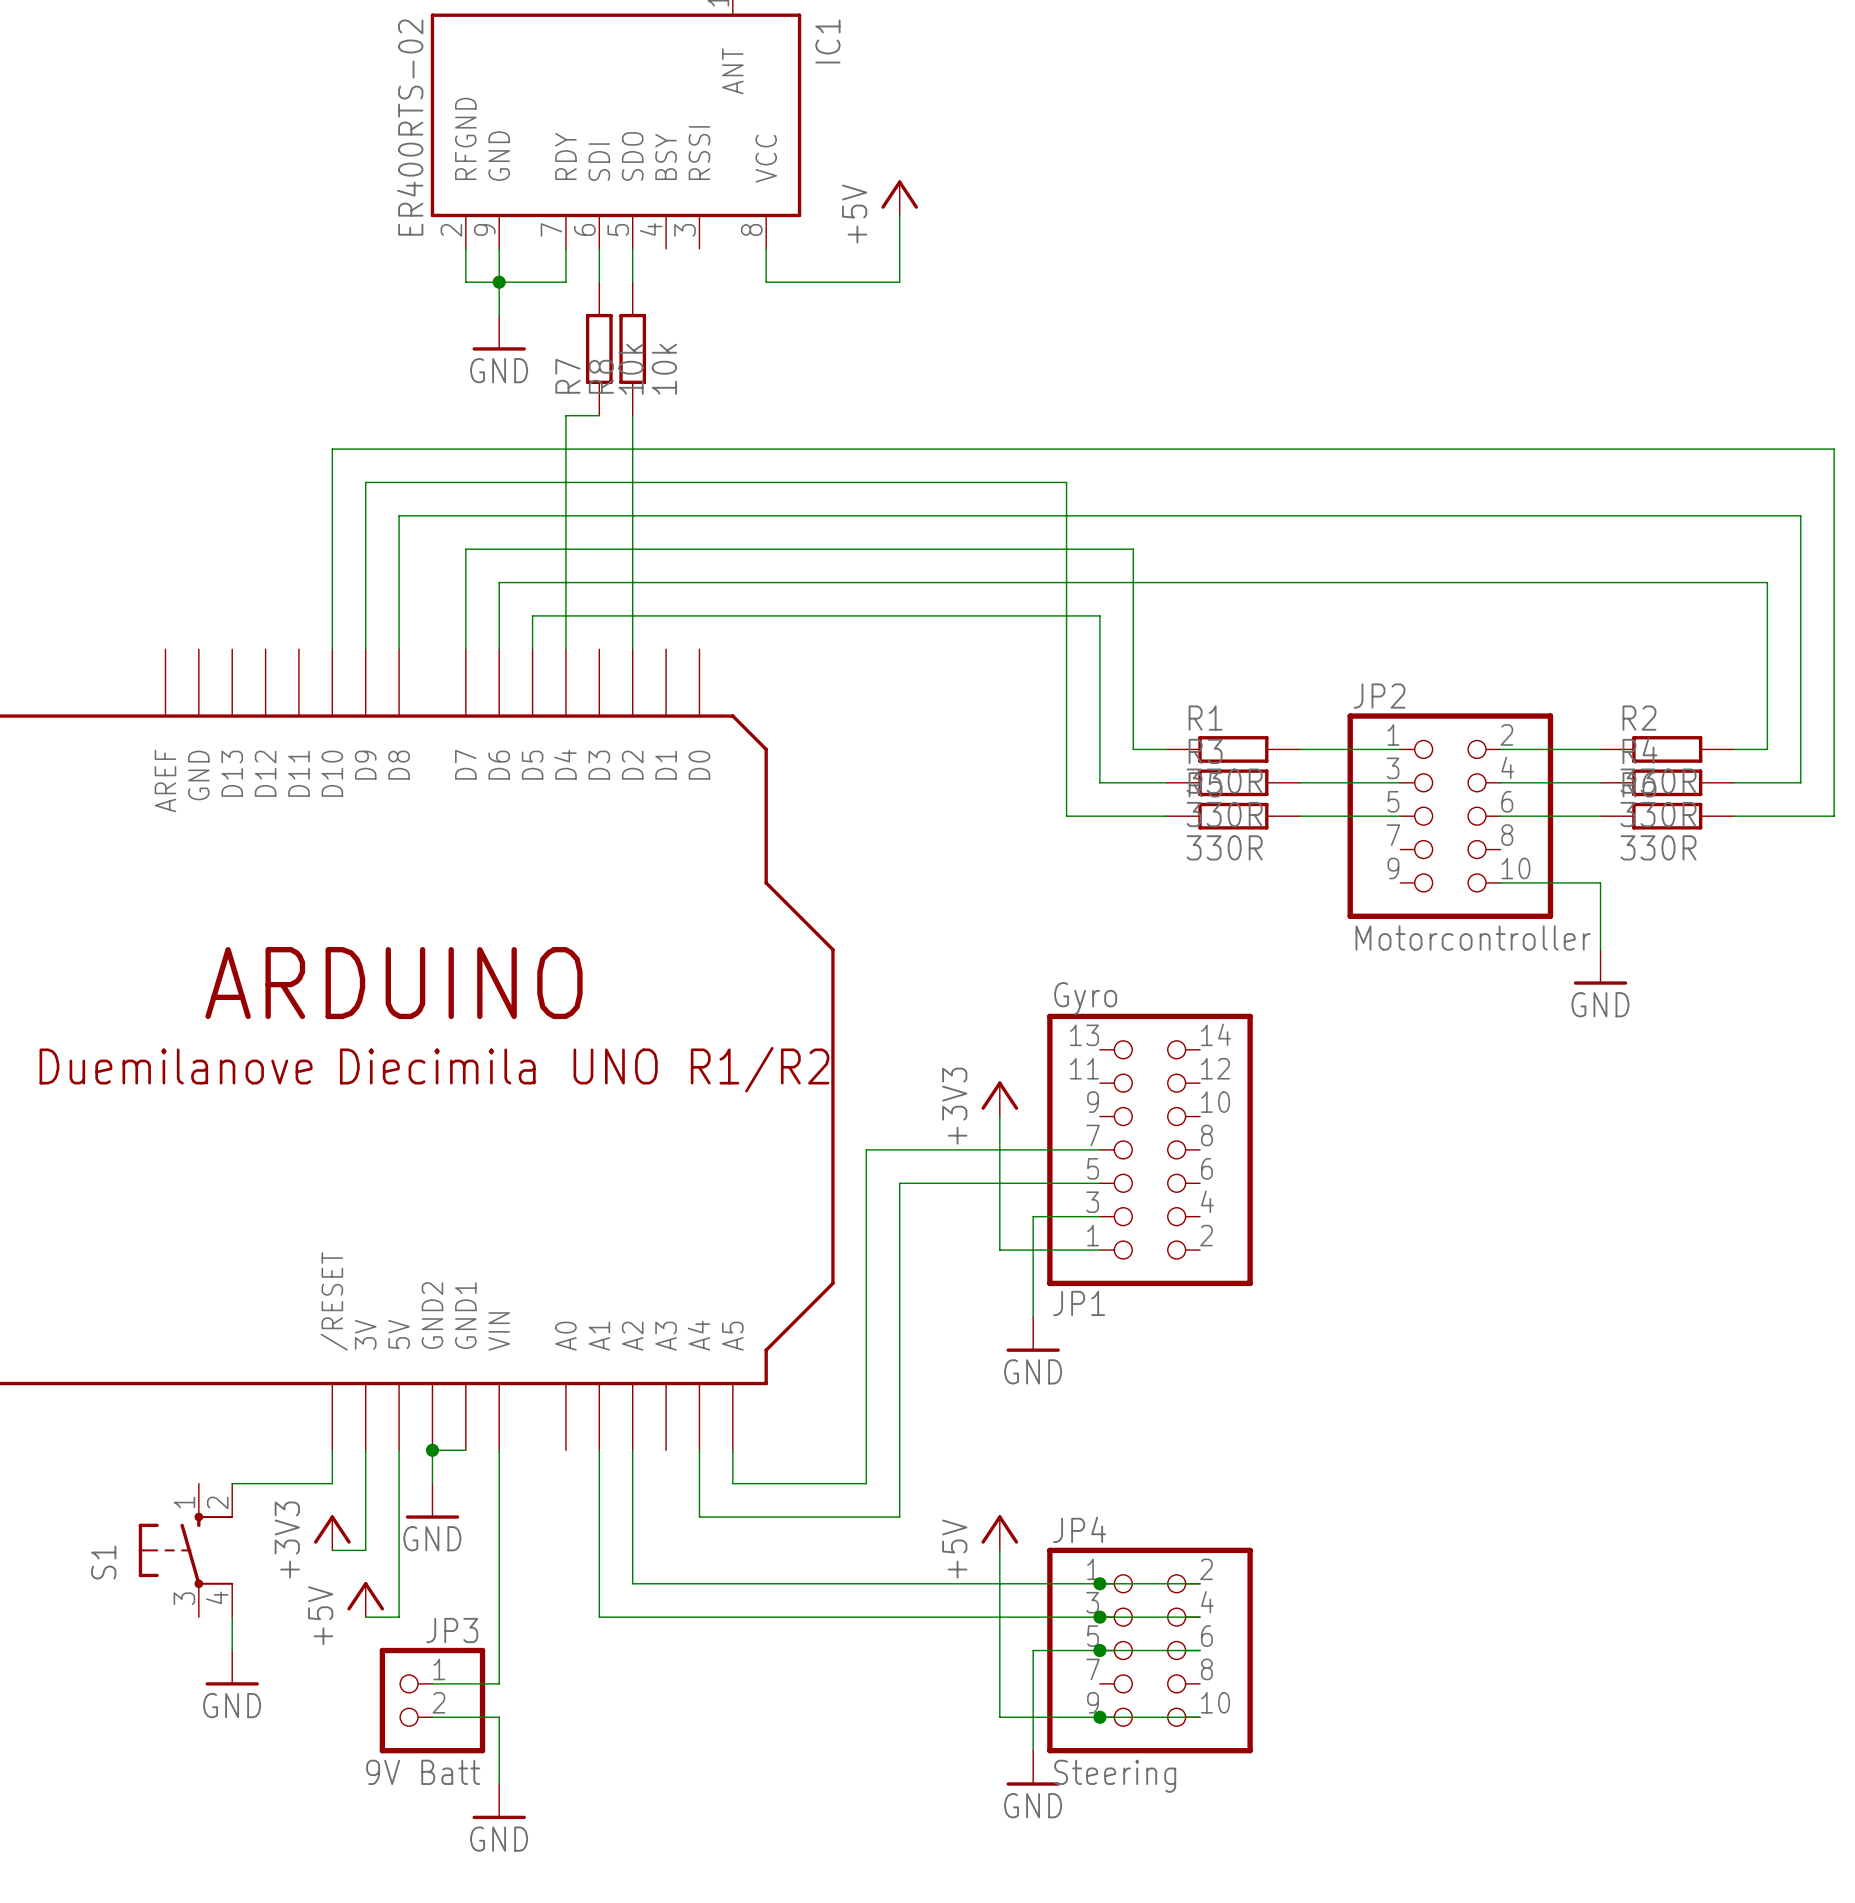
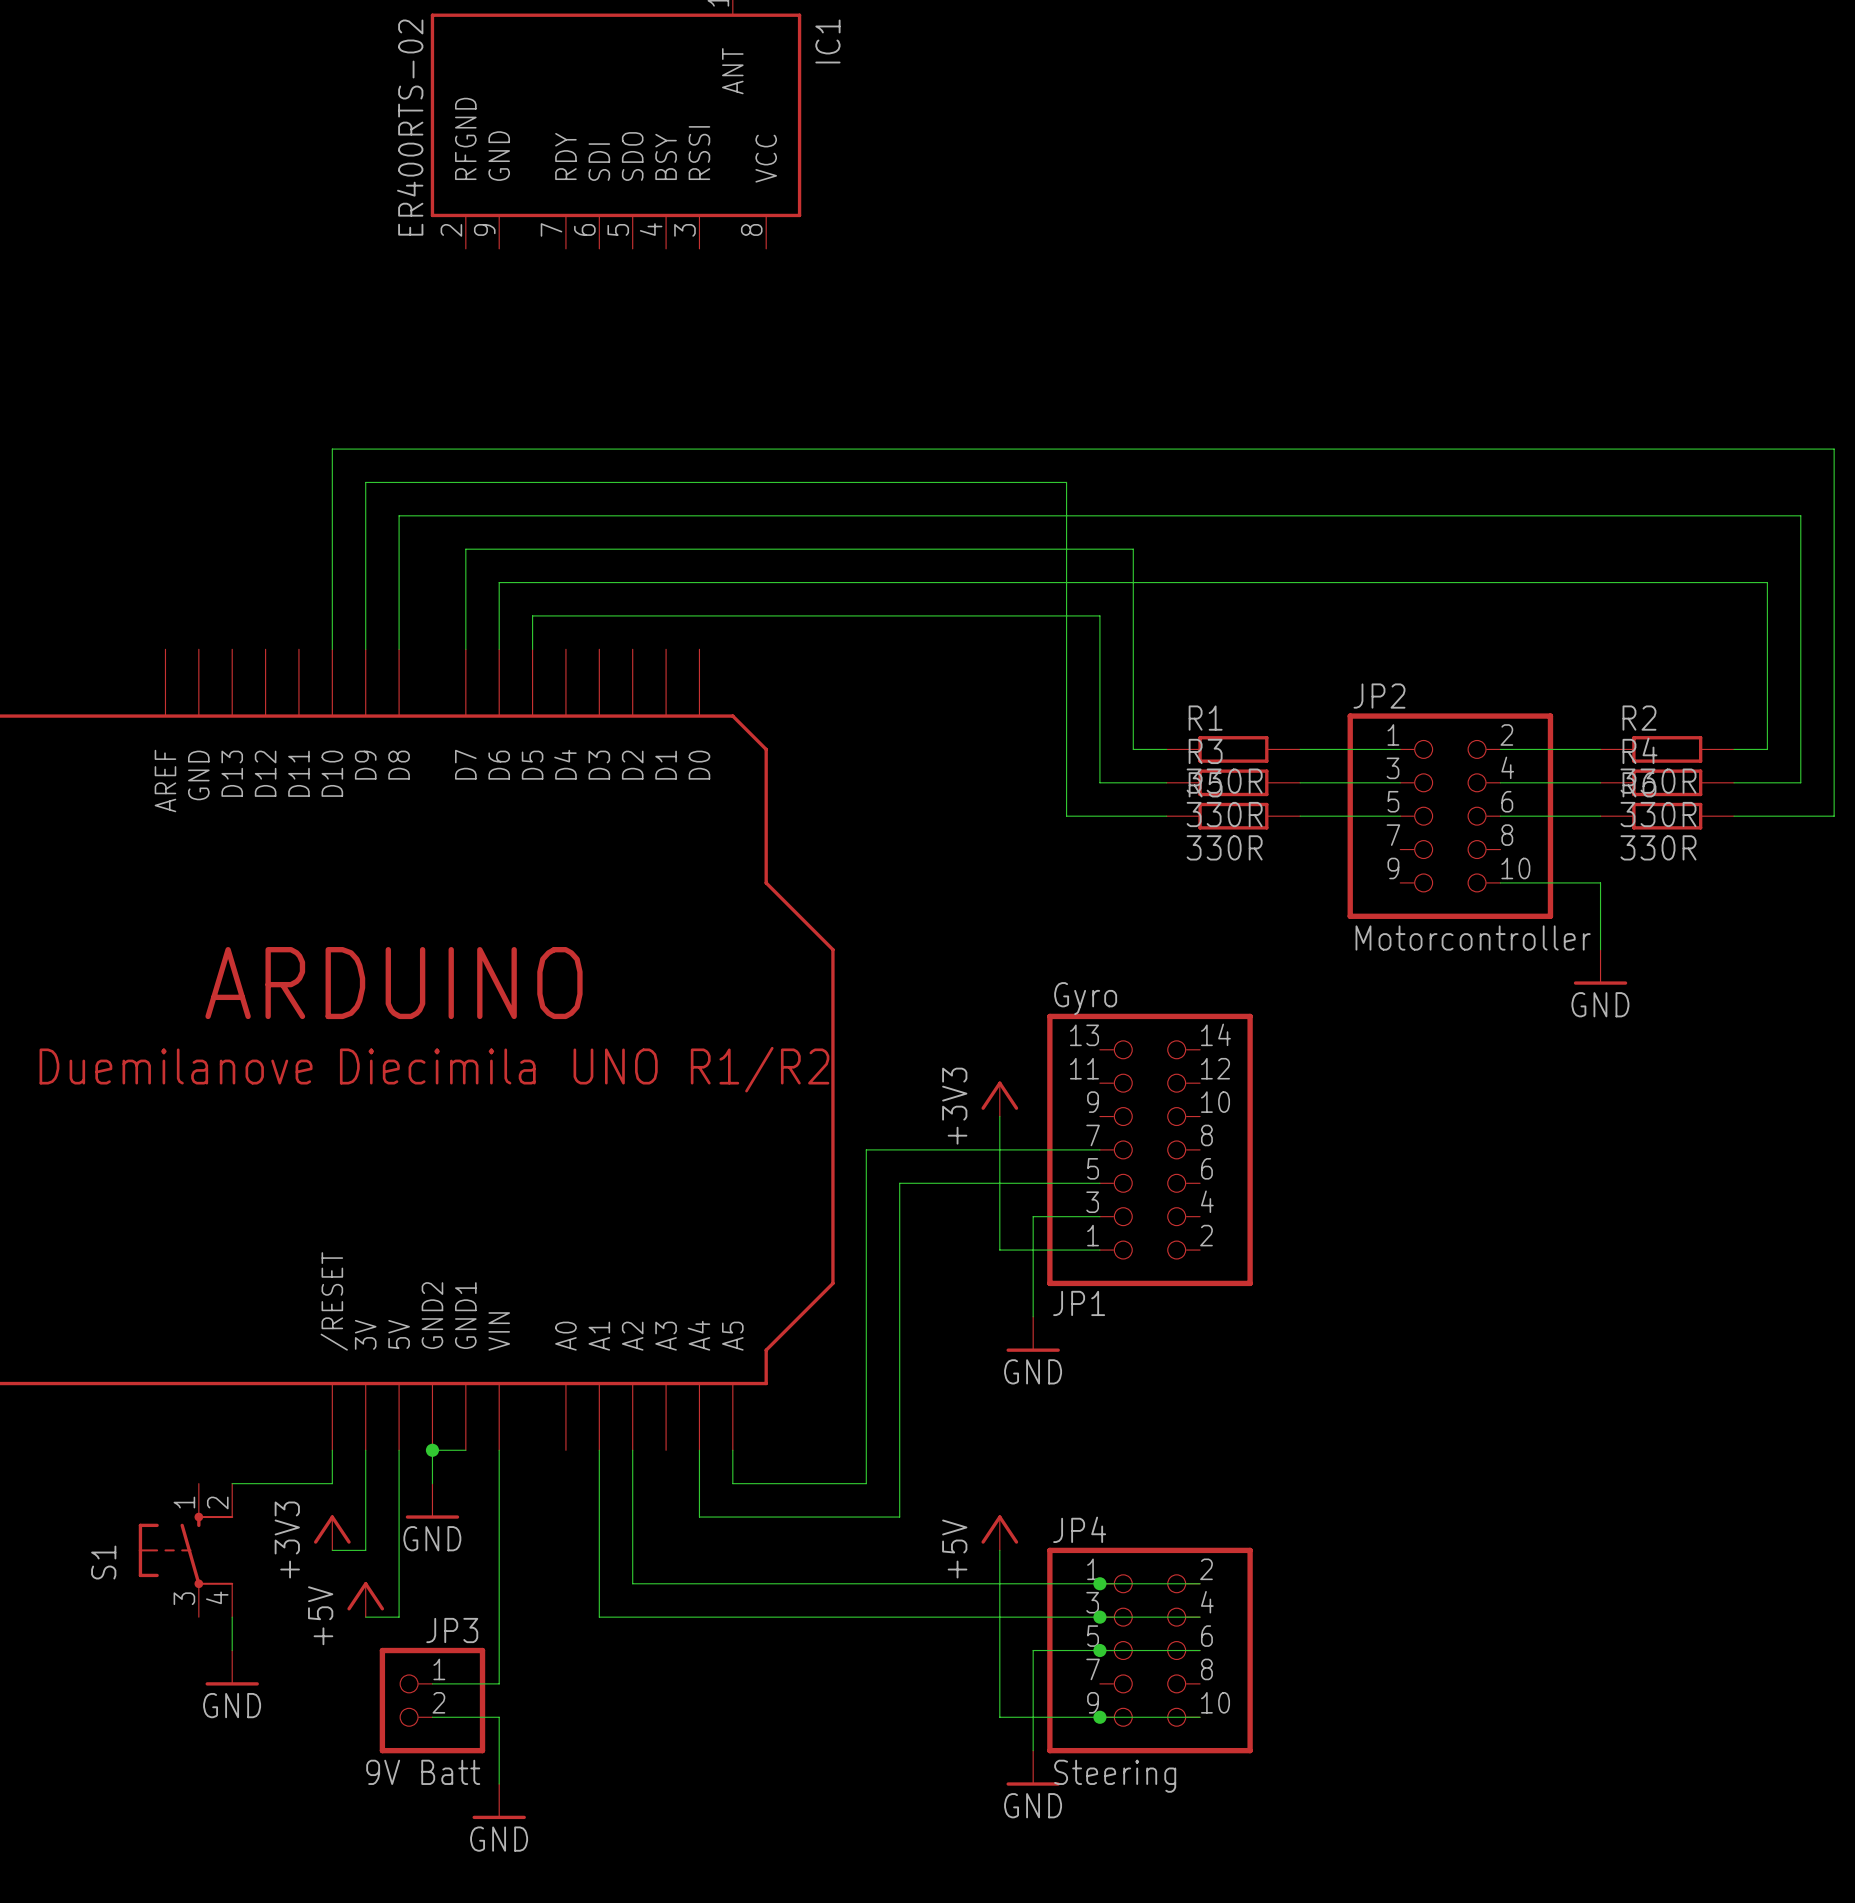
power symbol: +5V (899, 197) -> none
wire: (899, 215) (899, 282) (766, 282) (766, 248) -> none
wire: (465, 248) (465, 282) (565, 282) (565, 248) -> none
wire: (499, 248) (499, 315) -> none
wire: (599, 248) (599, 282) -> none
wire: (632, 248) (632, 282) -> none
junction: (499, 282) -> none
power symbol: GND (499, 333) -> none
R7: 10k (599, 348) -> none
R8: 10k (632, 348) -> none
wire: (599, 415) (565, 415) (565, 649) -> none
wire: (632, 415) (632, 649) -> none

